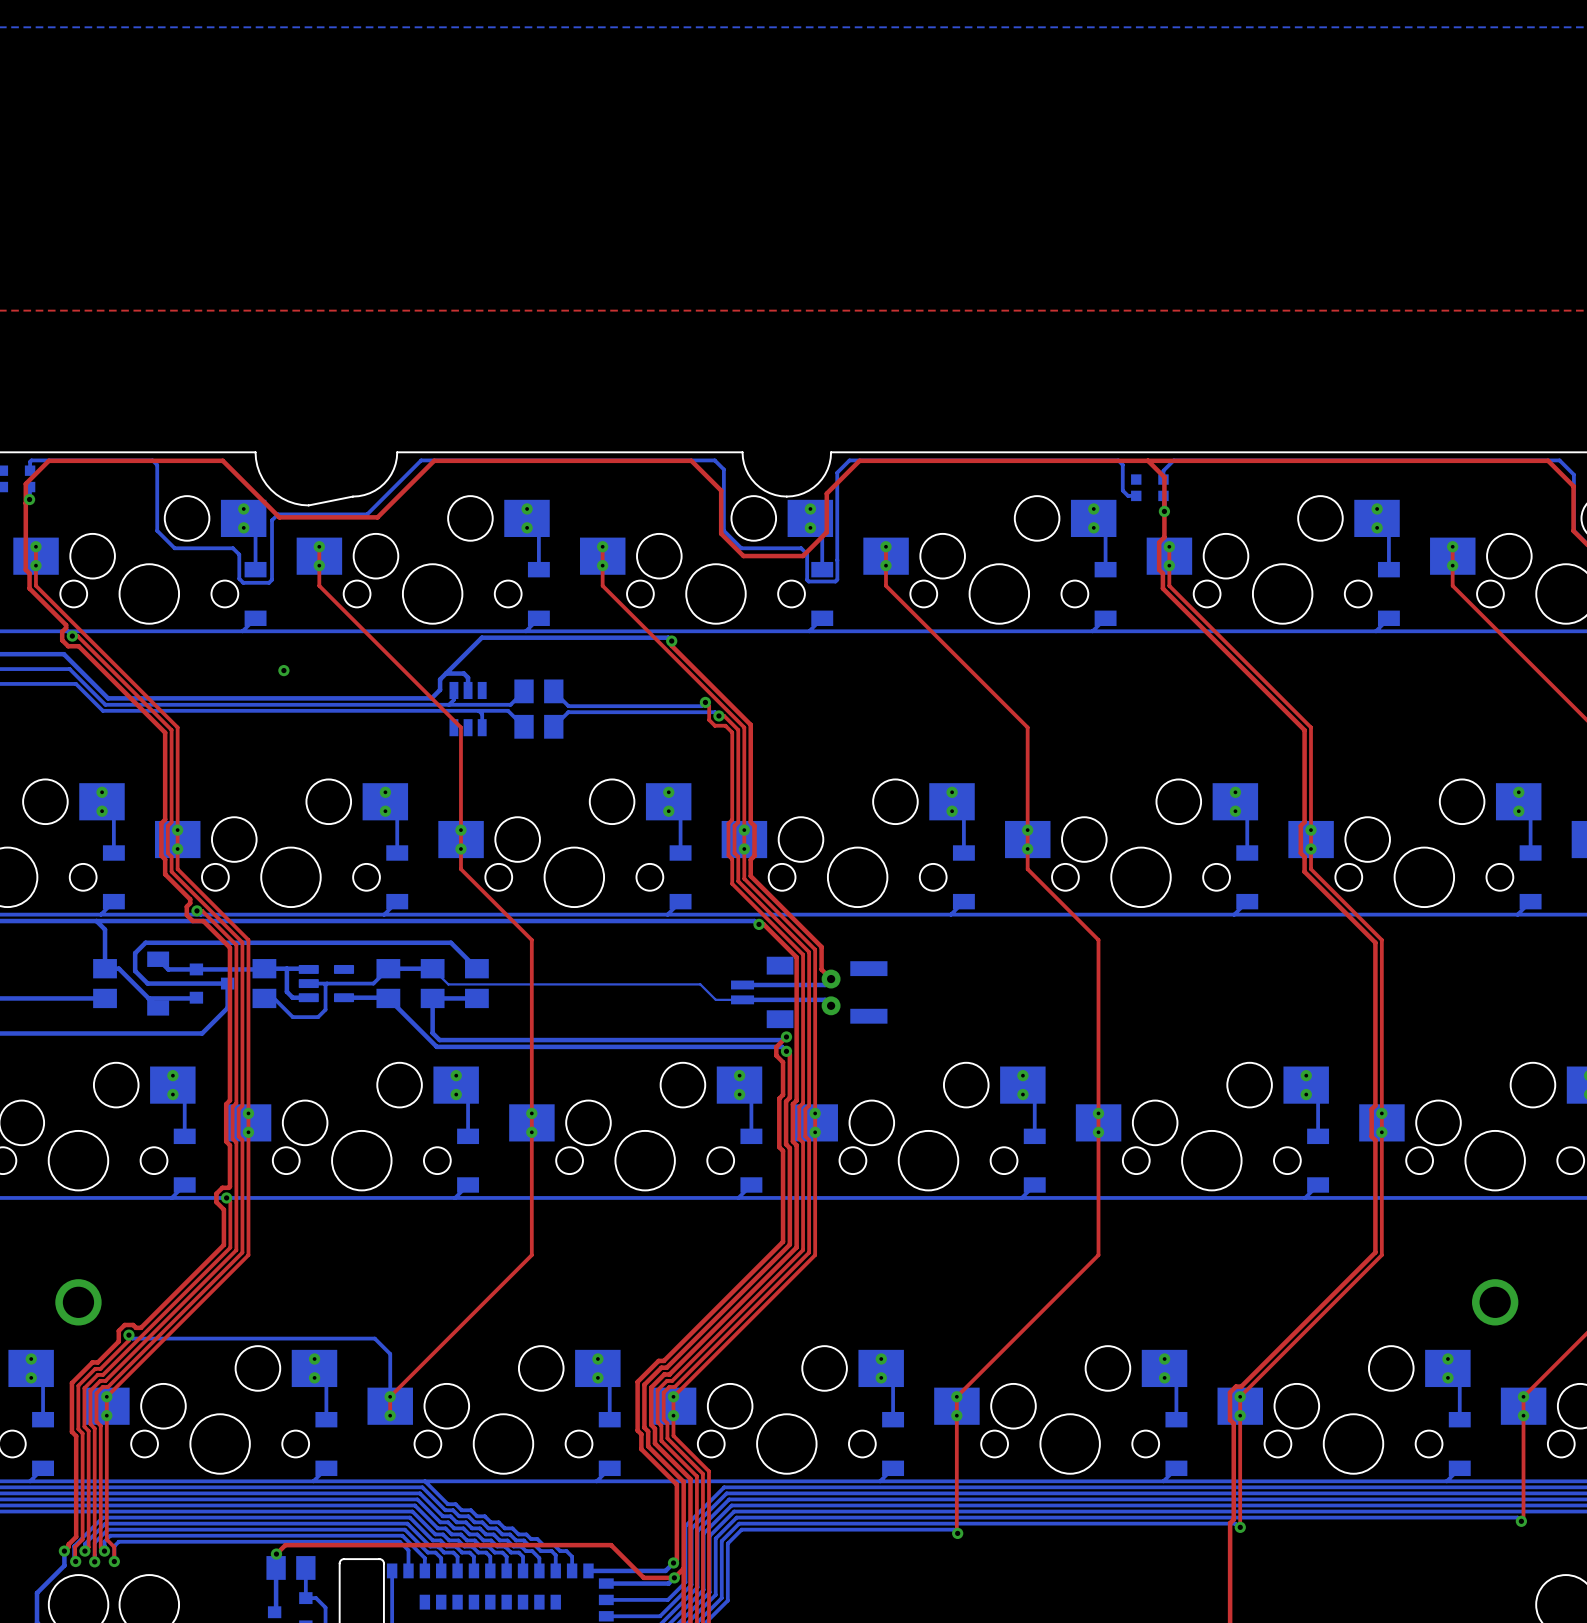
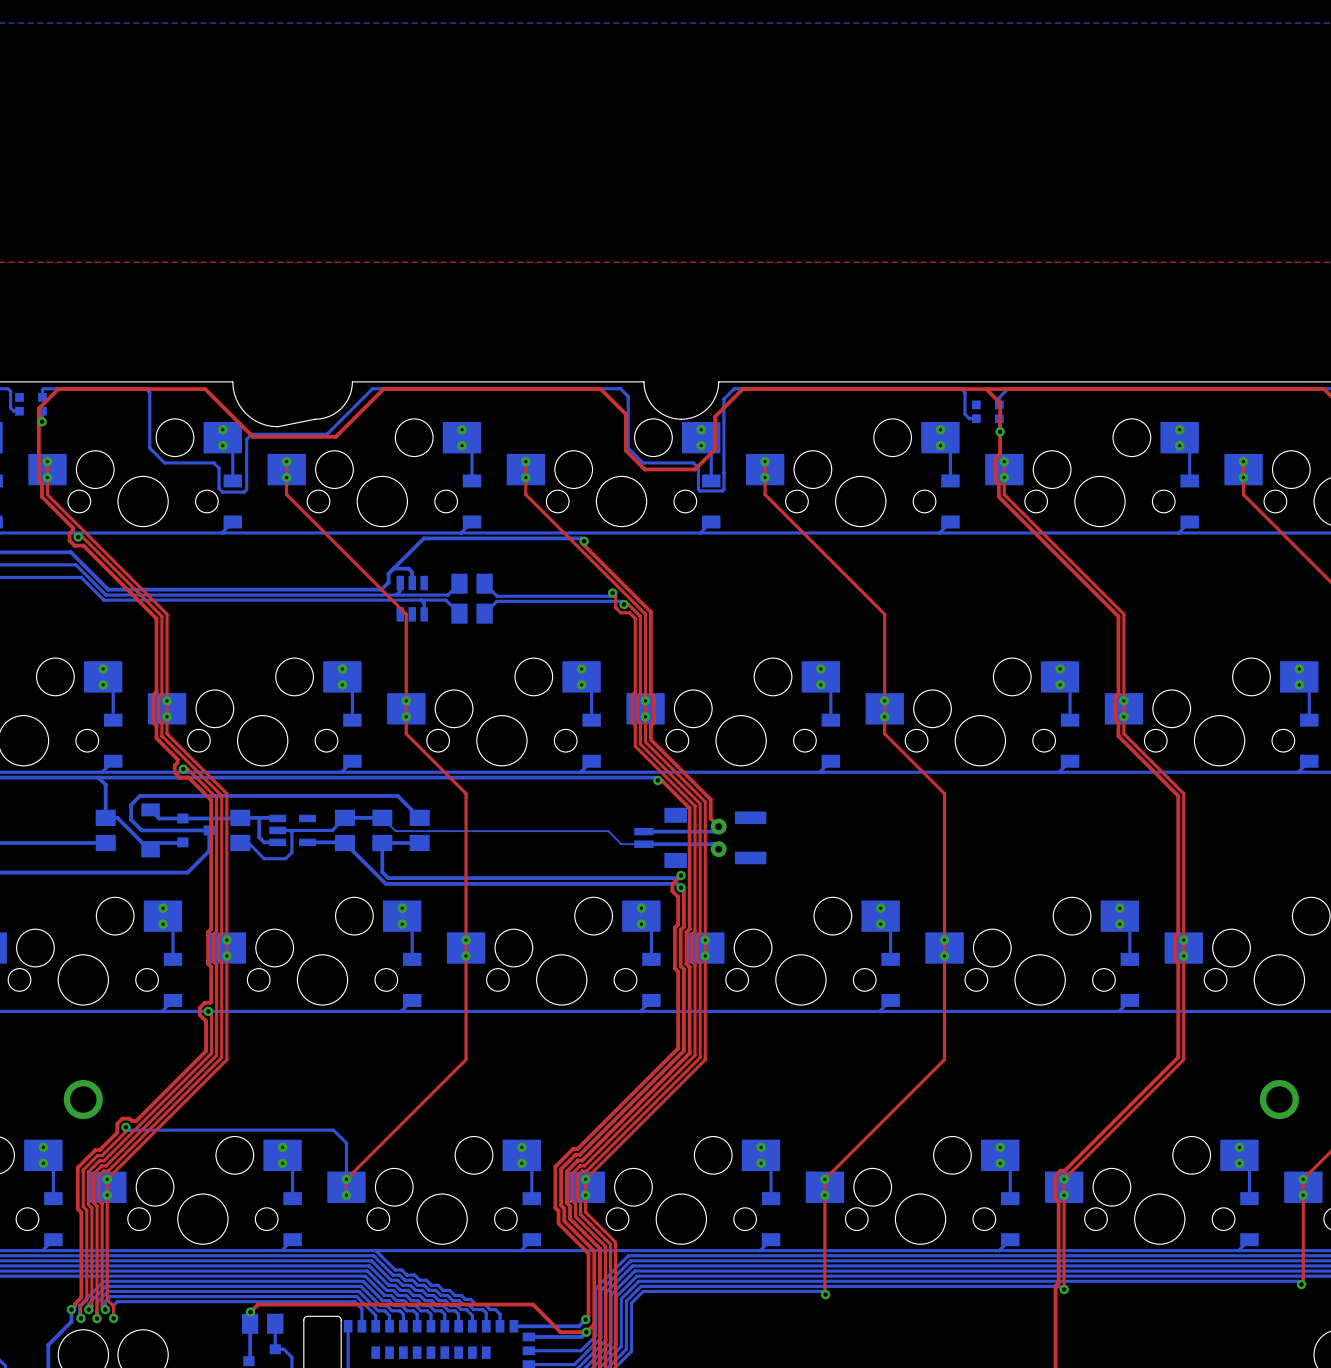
via: (283, 670) -> none

